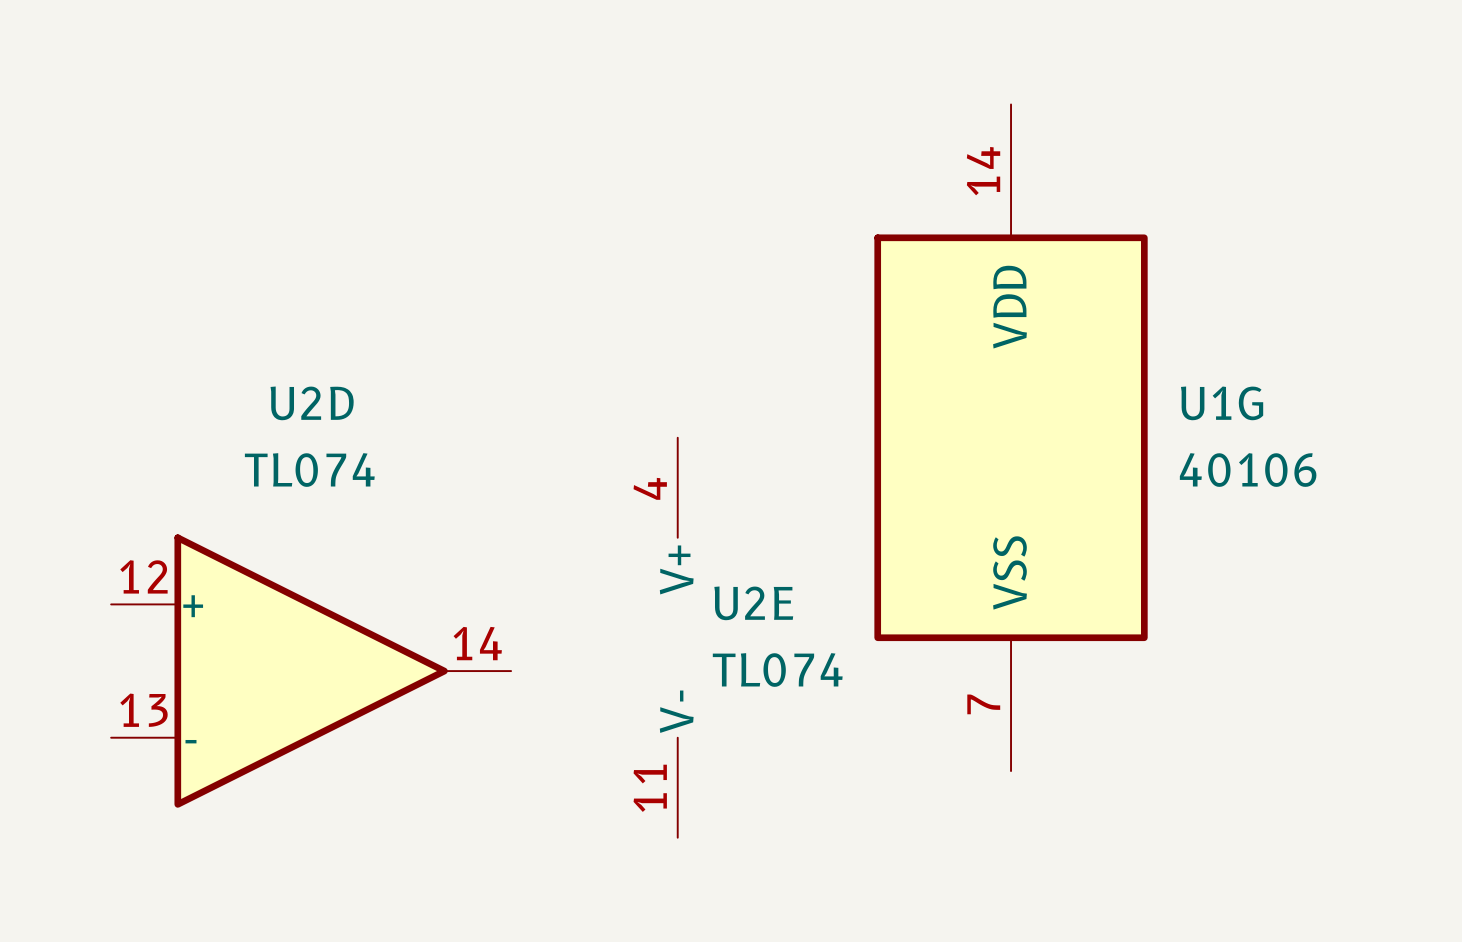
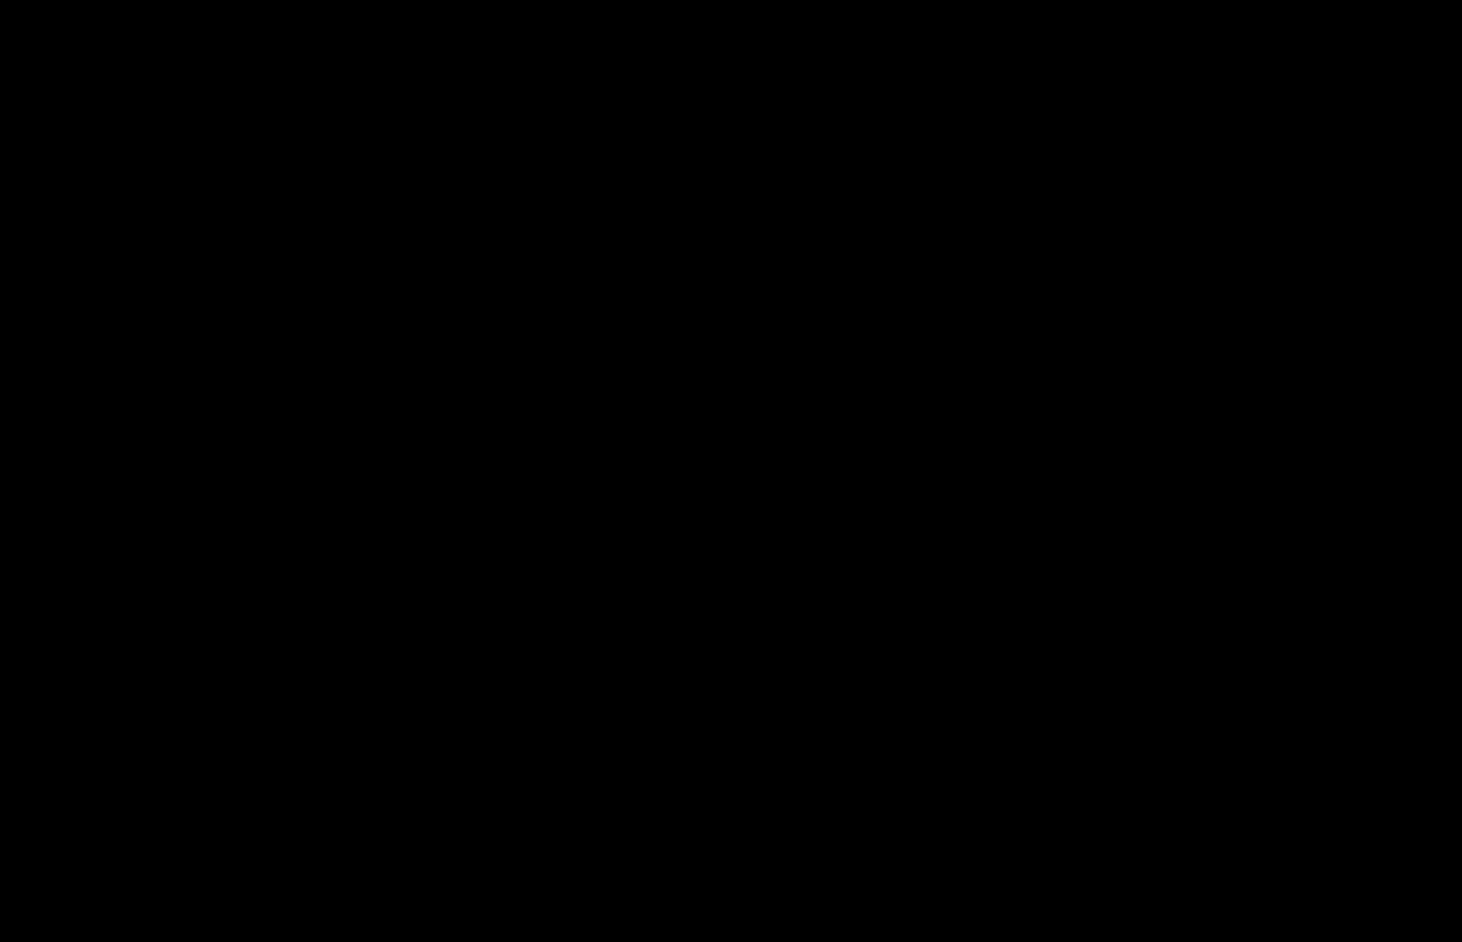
U1G: 40106 (1011, 437) -> none
U2E: TL074 (677, 637) -> none
U2D: TL074 (311, 671) -> none

